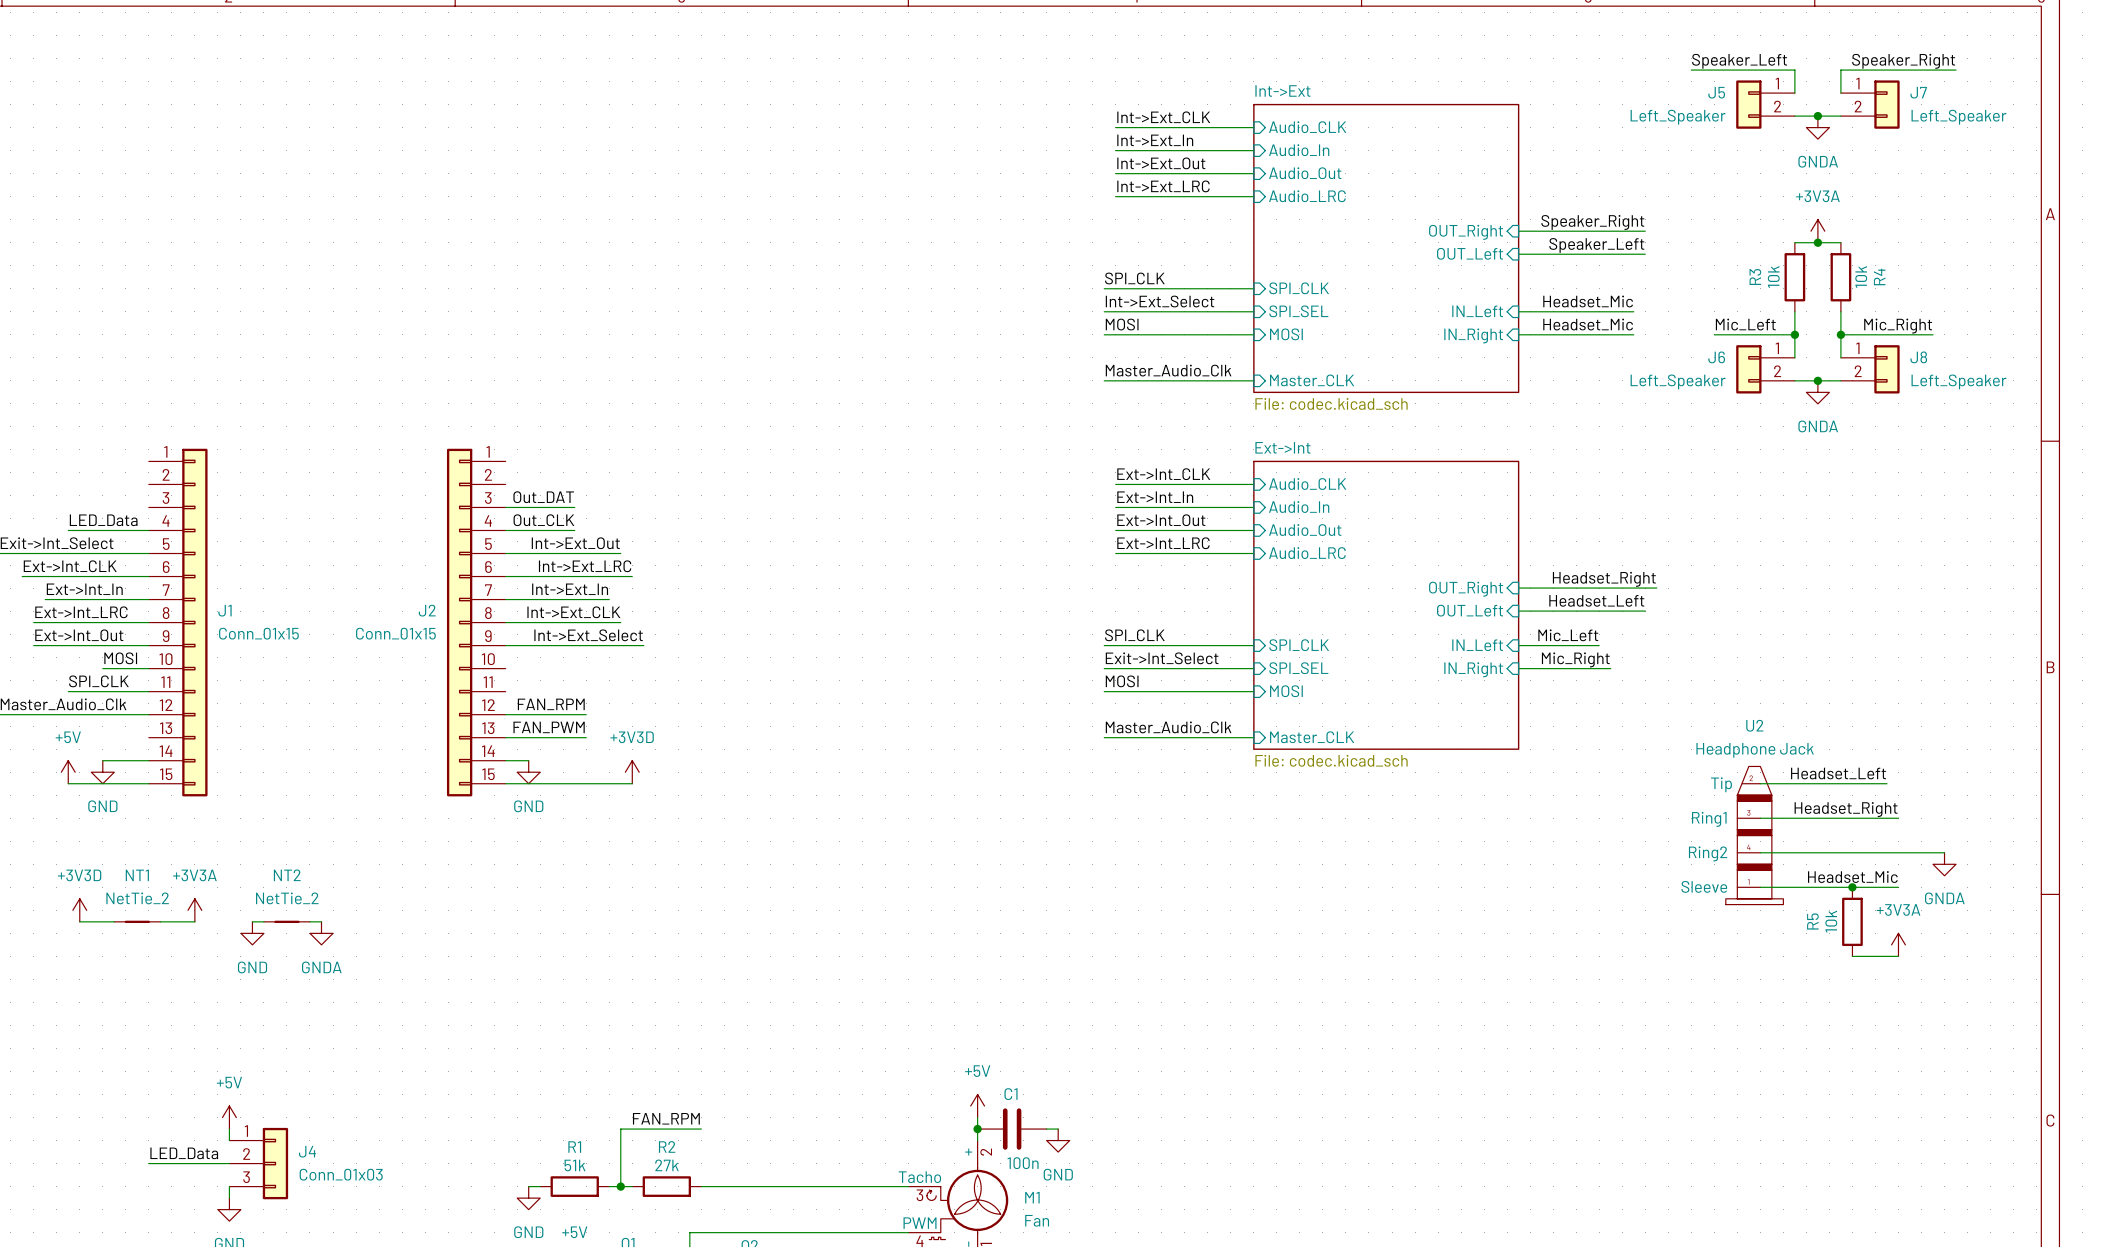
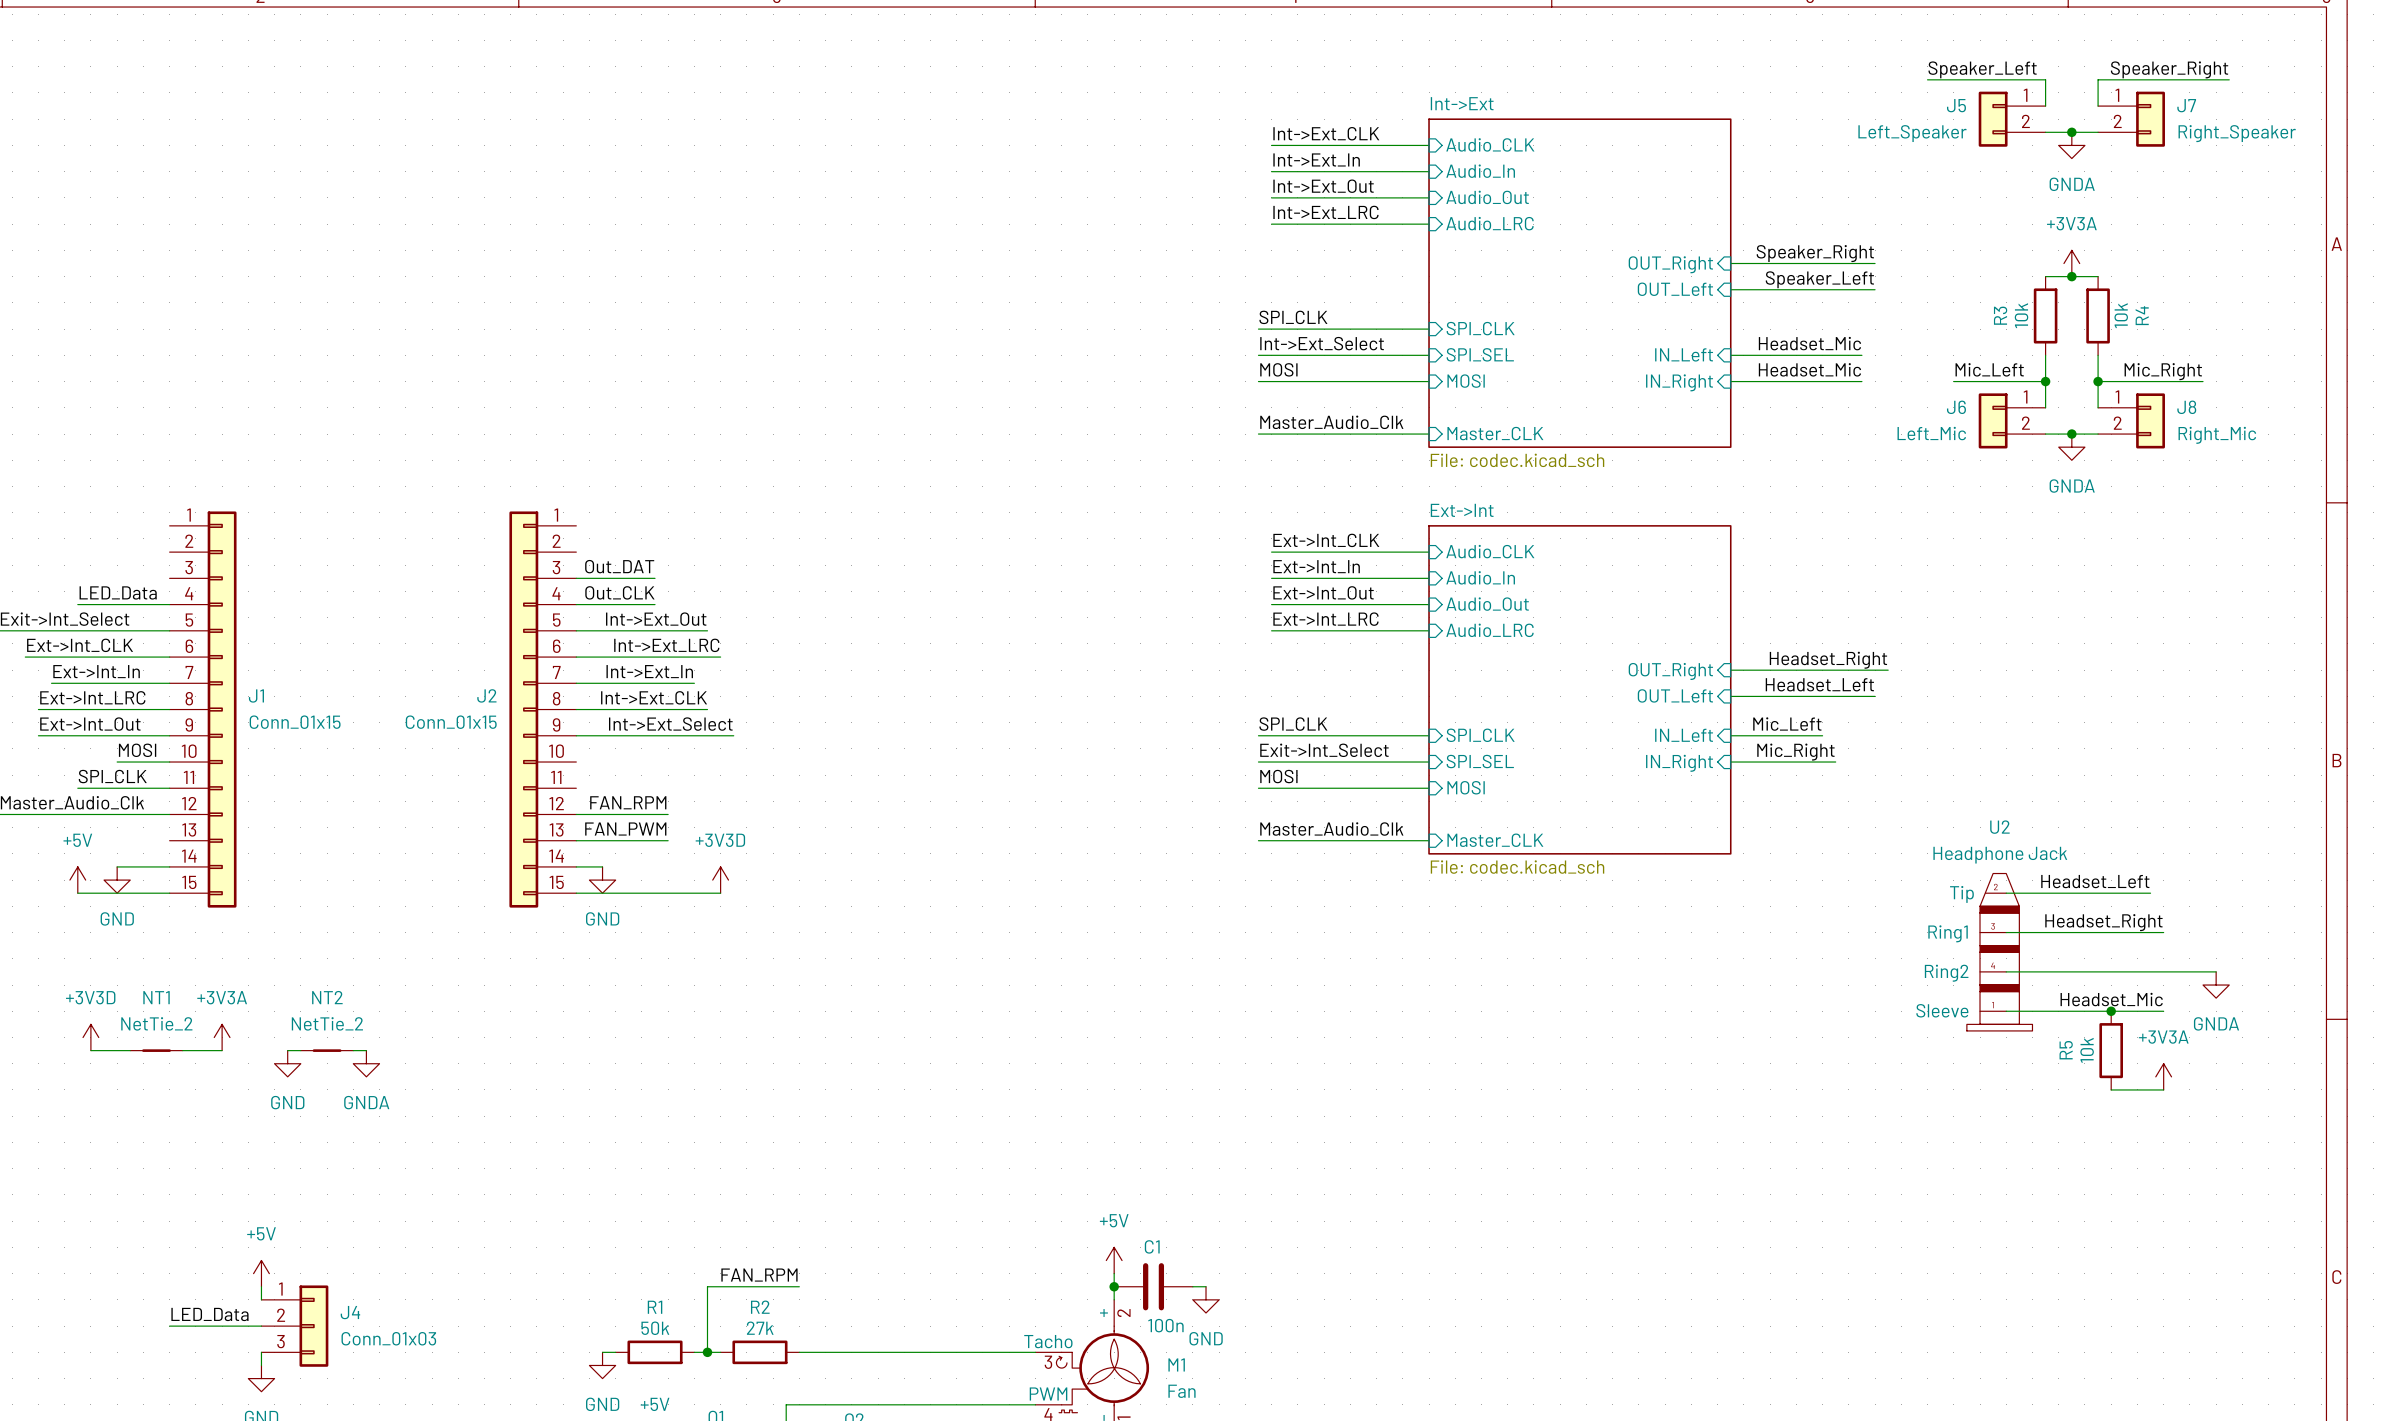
J7 value: Left_Speaker (1959, 117) -> Right_Speaker (2237, 133)
J6 value: Left_Speaker (1678, 381) -> Left_Mic (1931, 433)
J8 value: Left_Speaker (1959, 381) -> Right_Mic (2217, 435)
R1 value: 51k (575, 1165) -> 50k (655, 1328)

